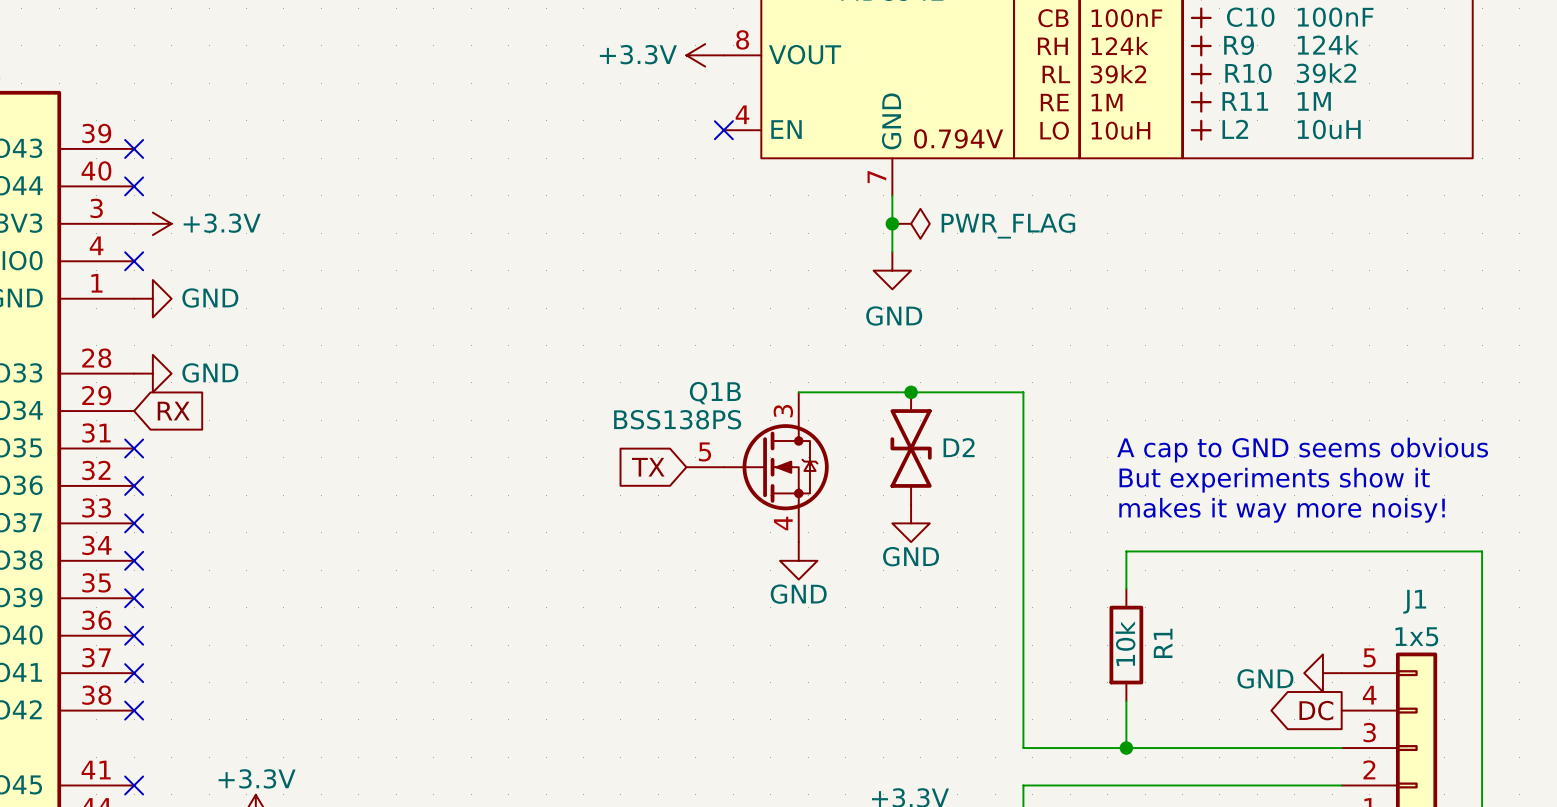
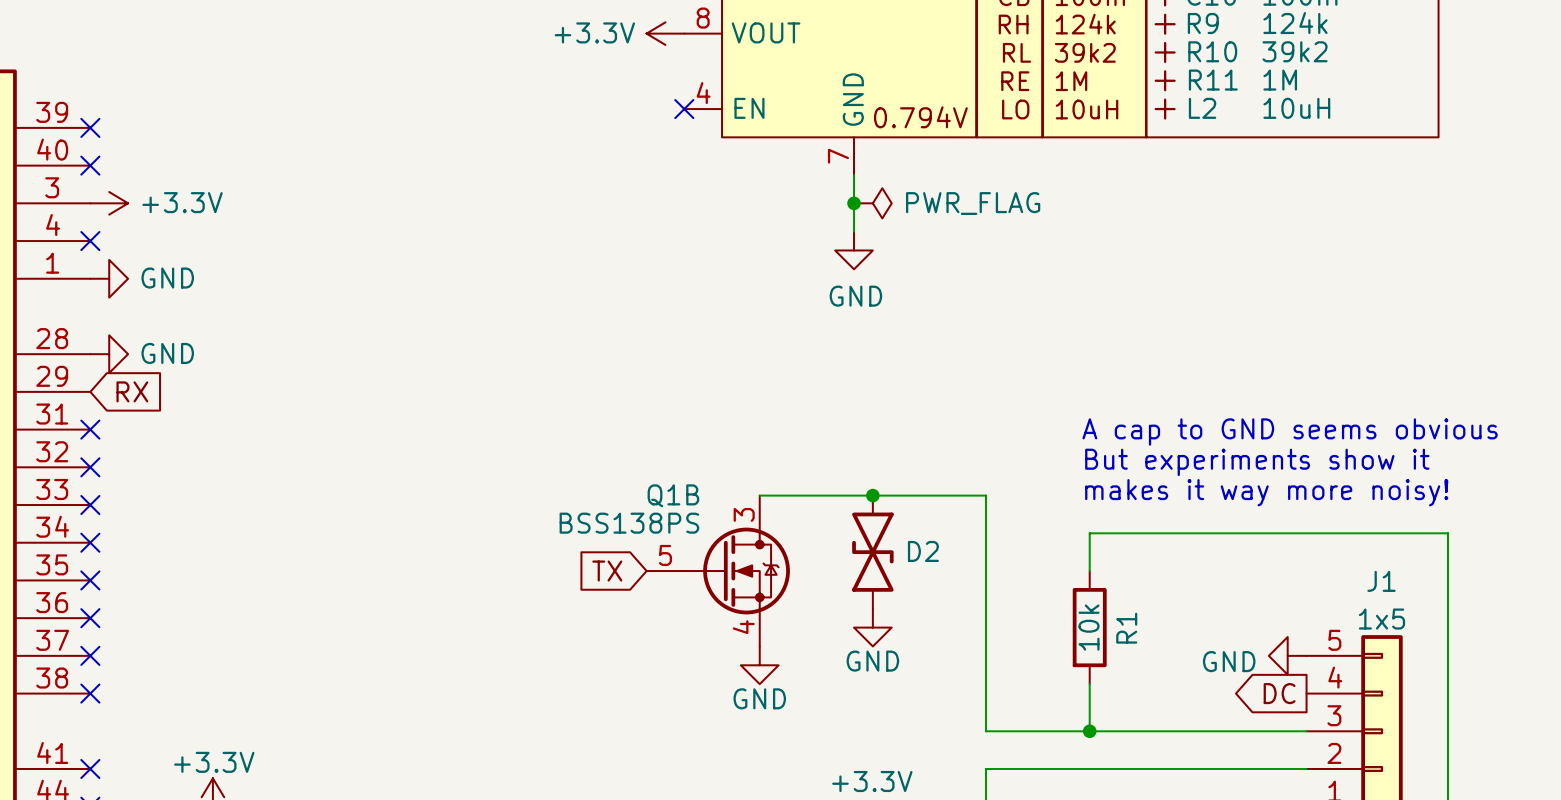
wire: (798, 392) (1023, 392) (1023, 514) -> (759, 495) (986, 495)
junction: (911, 392) -> none
D2 position: (911, 448) -> (872, 552)
global label position: TX (648, 467) -> TX (607, 571)
Q1B position: (757, 467) -> (718, 571)
junction: none -> (872, 495)
power symbol: GND (911, 523) -> none
power symbol: GND (798, 560) -> none
power symbol: none -> GND (872, 627)
power symbol: none -> GND (759, 665)

